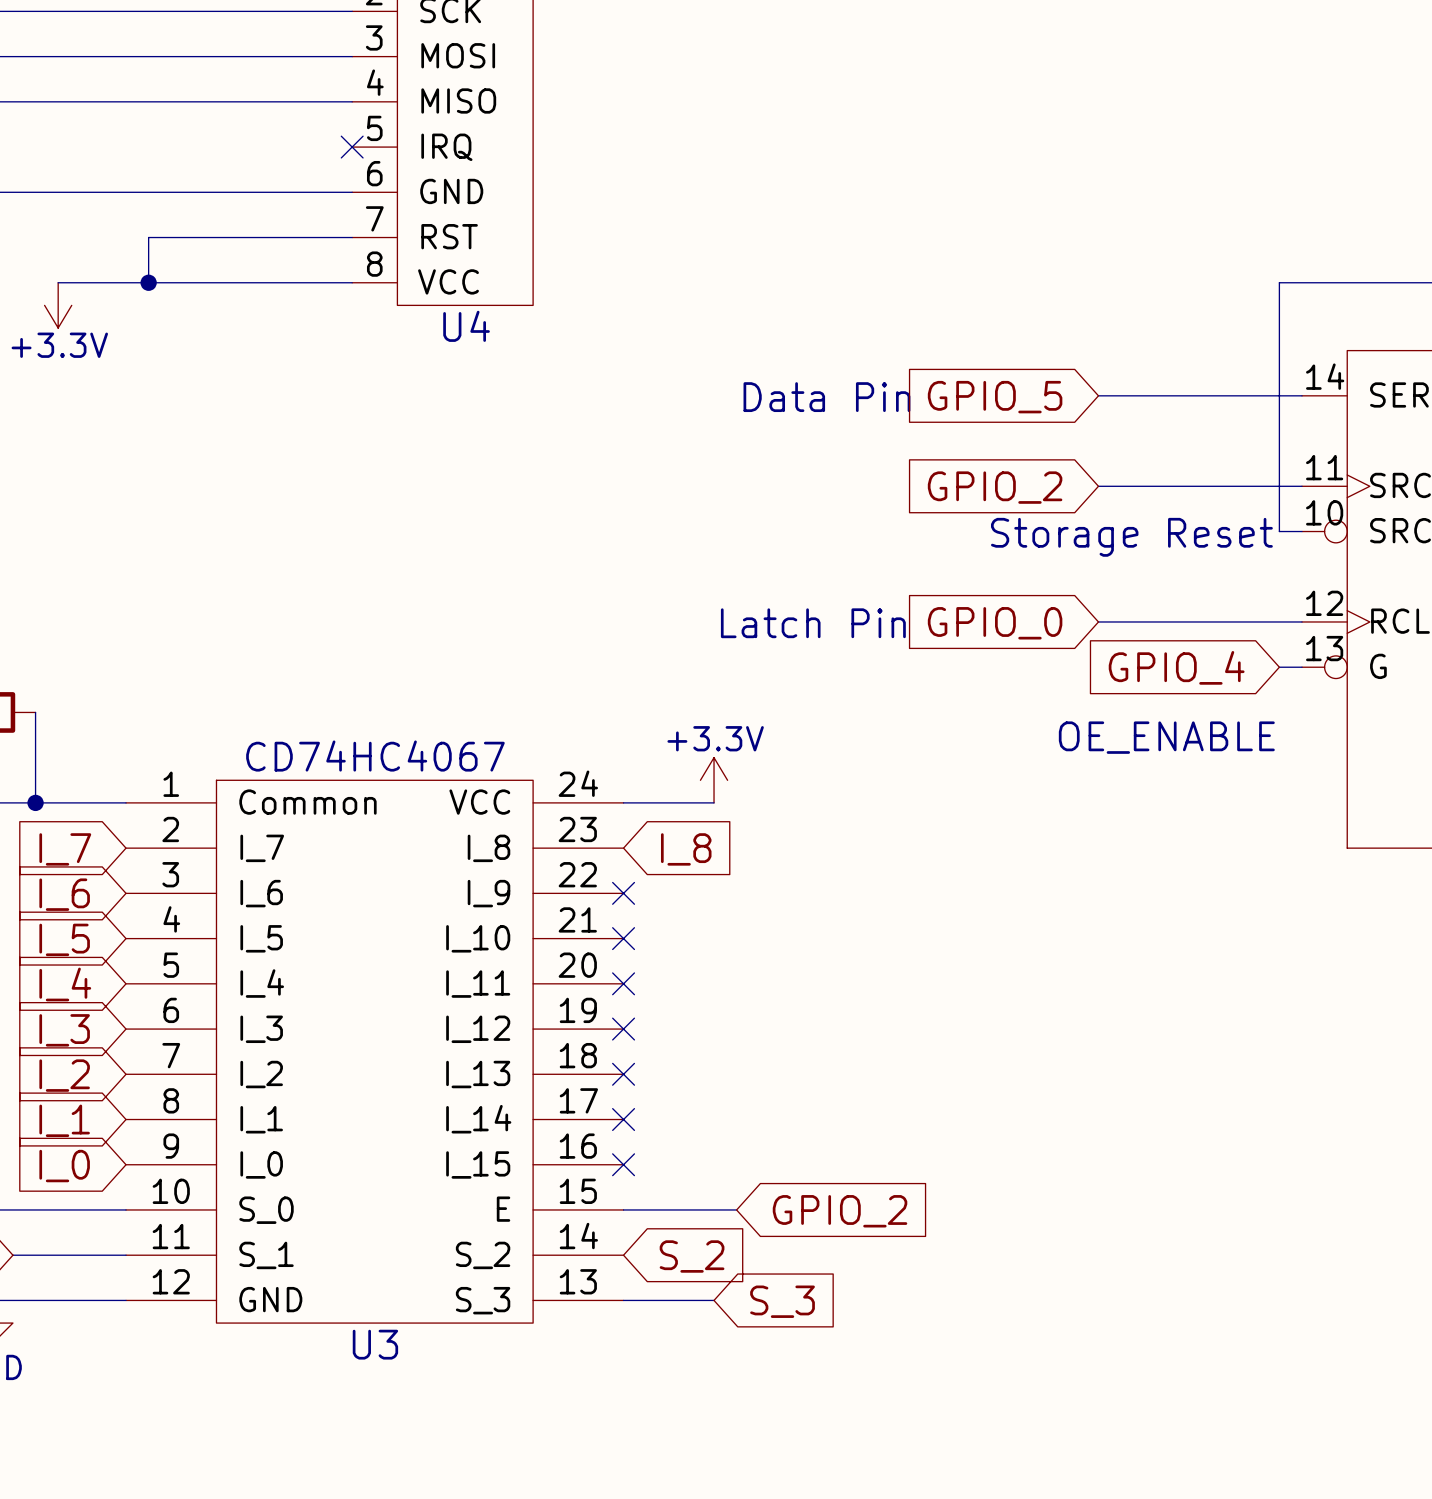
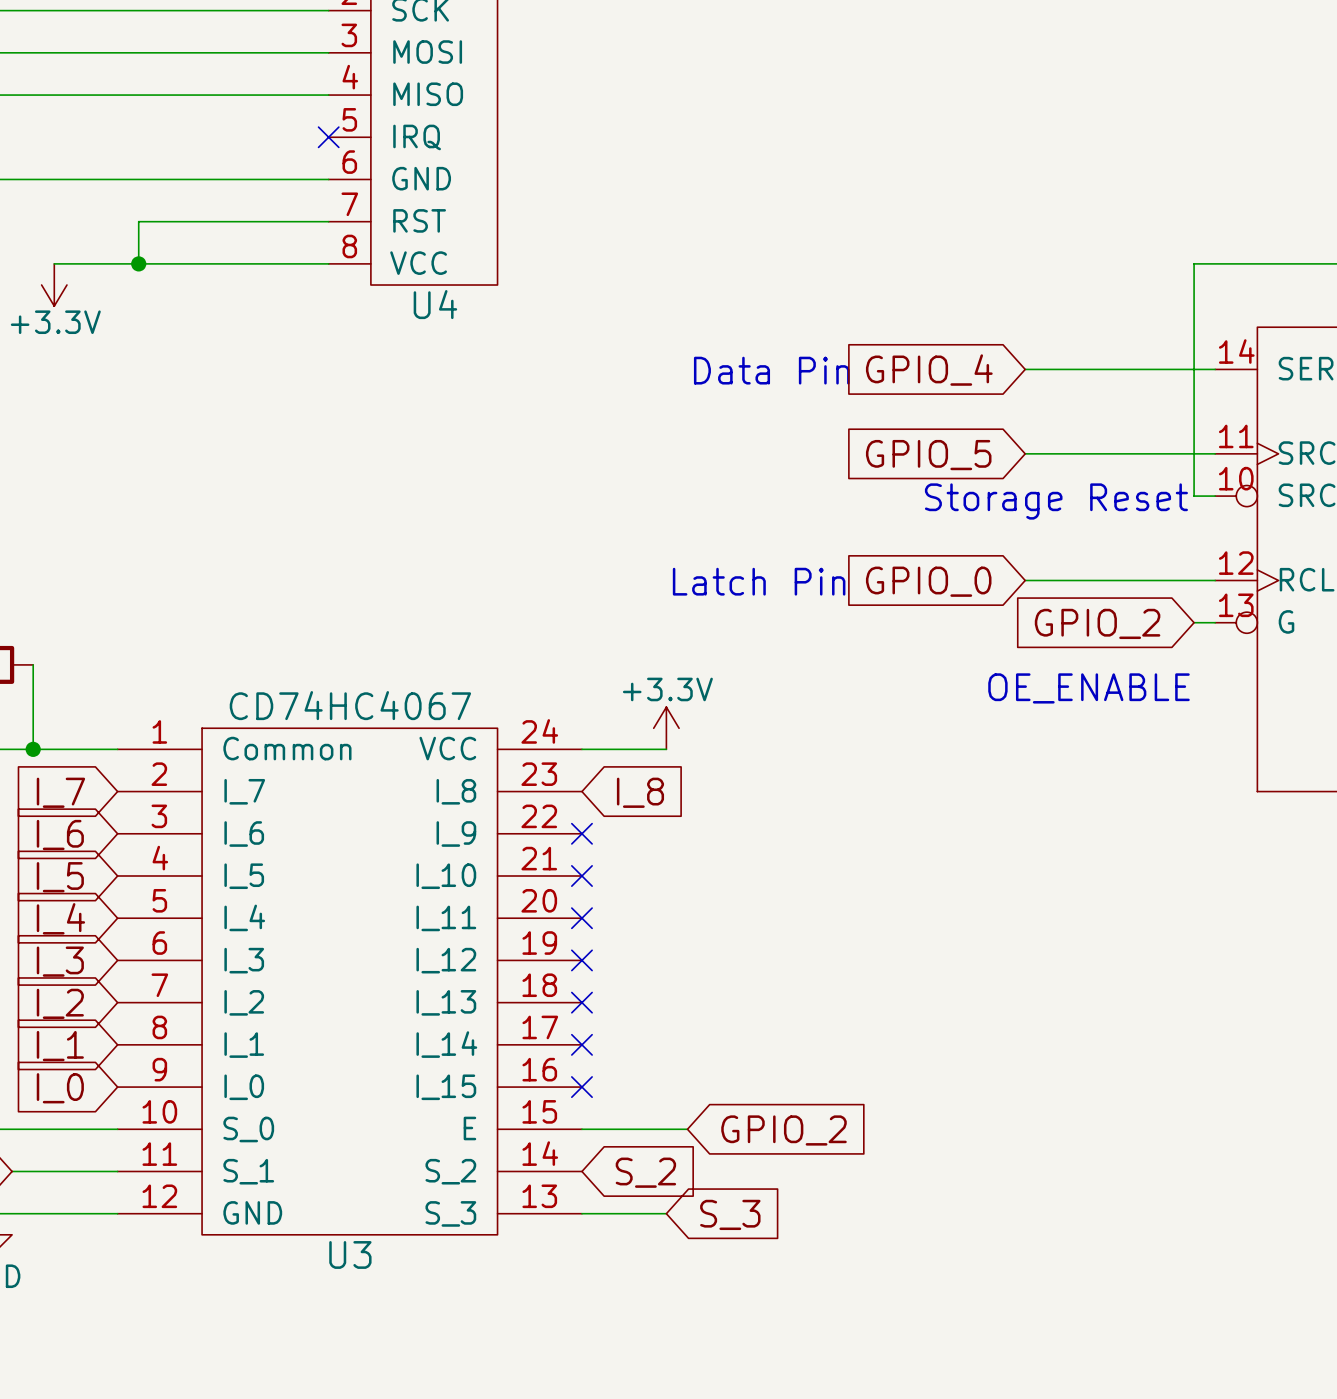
global label: GPIO_5 (995, 397) -> GPIO_4 (929, 370)
global label: GPIO_2 (995, 487) -> GPIO_5 (928, 455)
global label: GPIO_4 (1176, 667) -> GPIO_2 (1097, 623)

